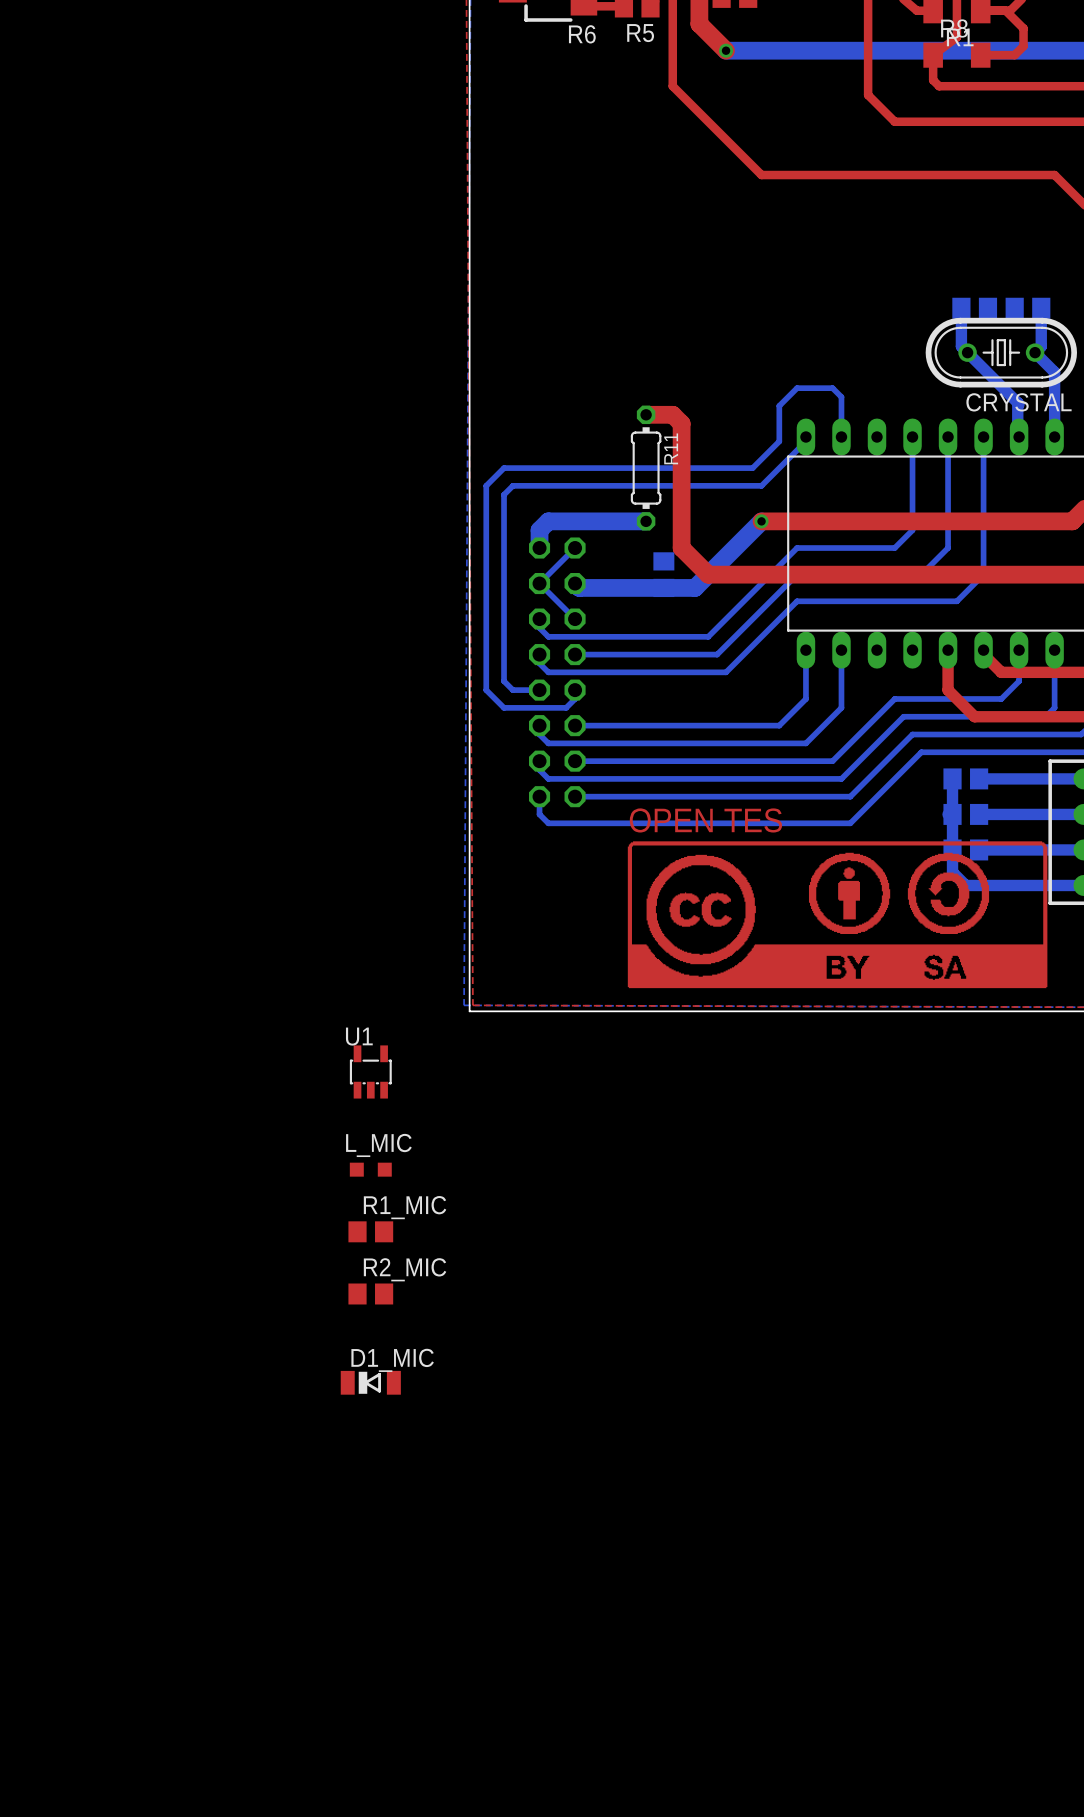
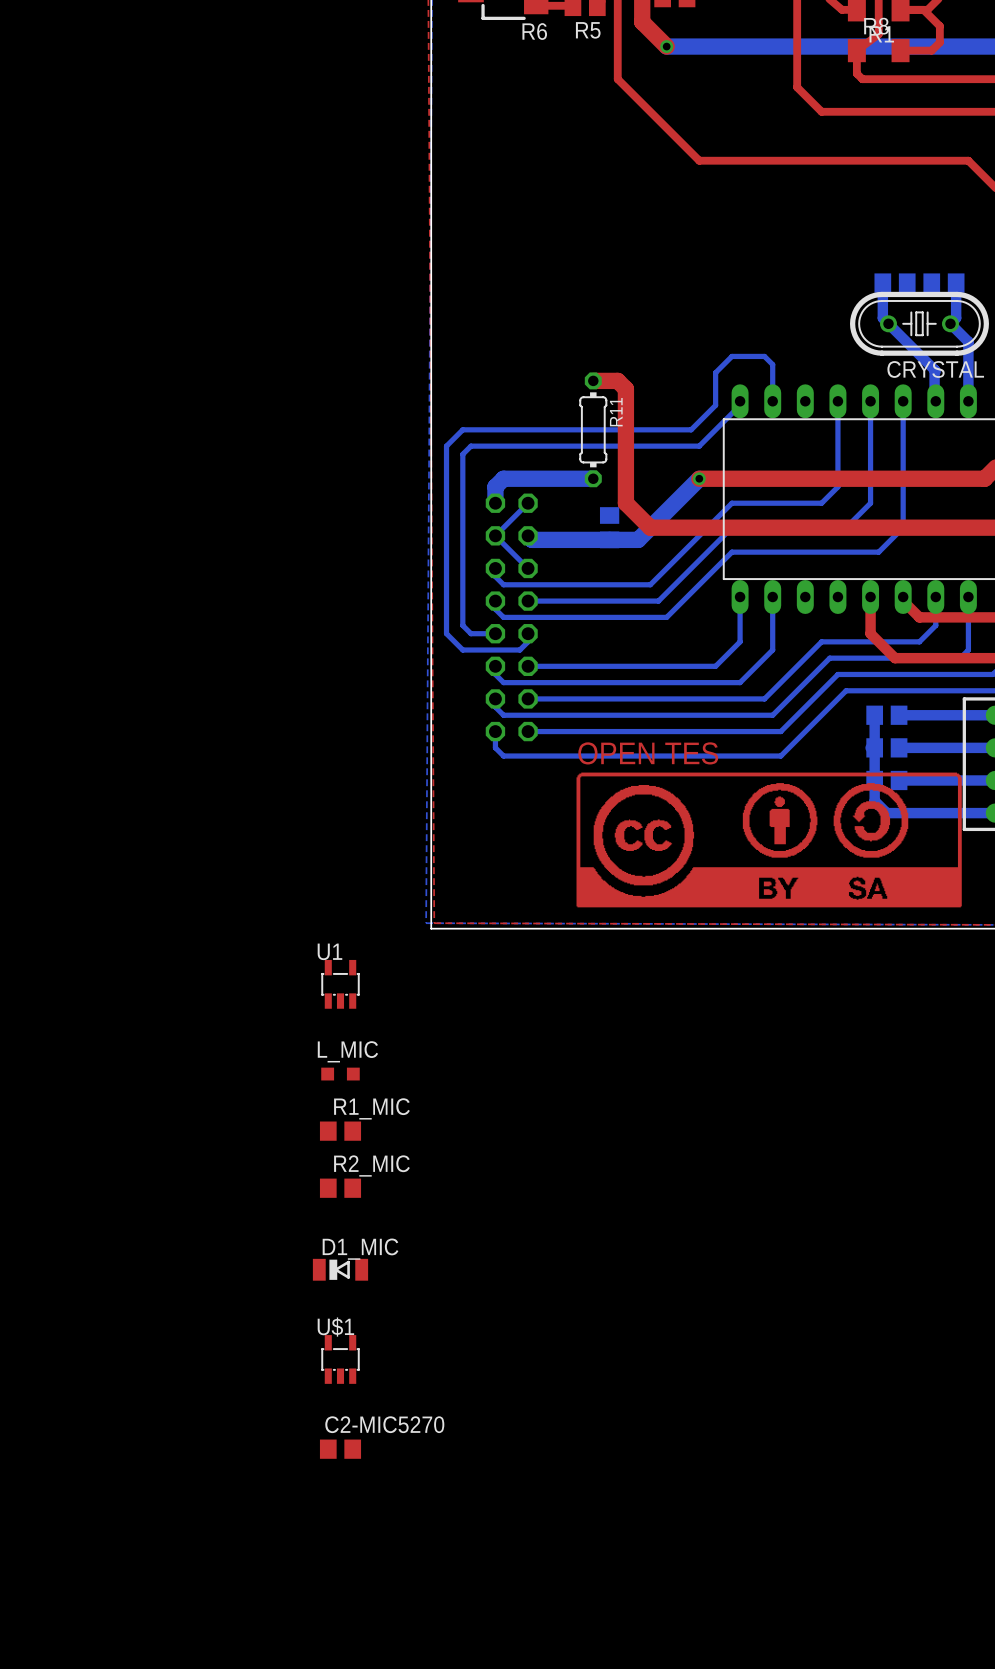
U$1: none -> (340, 1359)
C2-MIC5270: none -> (340, 1449)

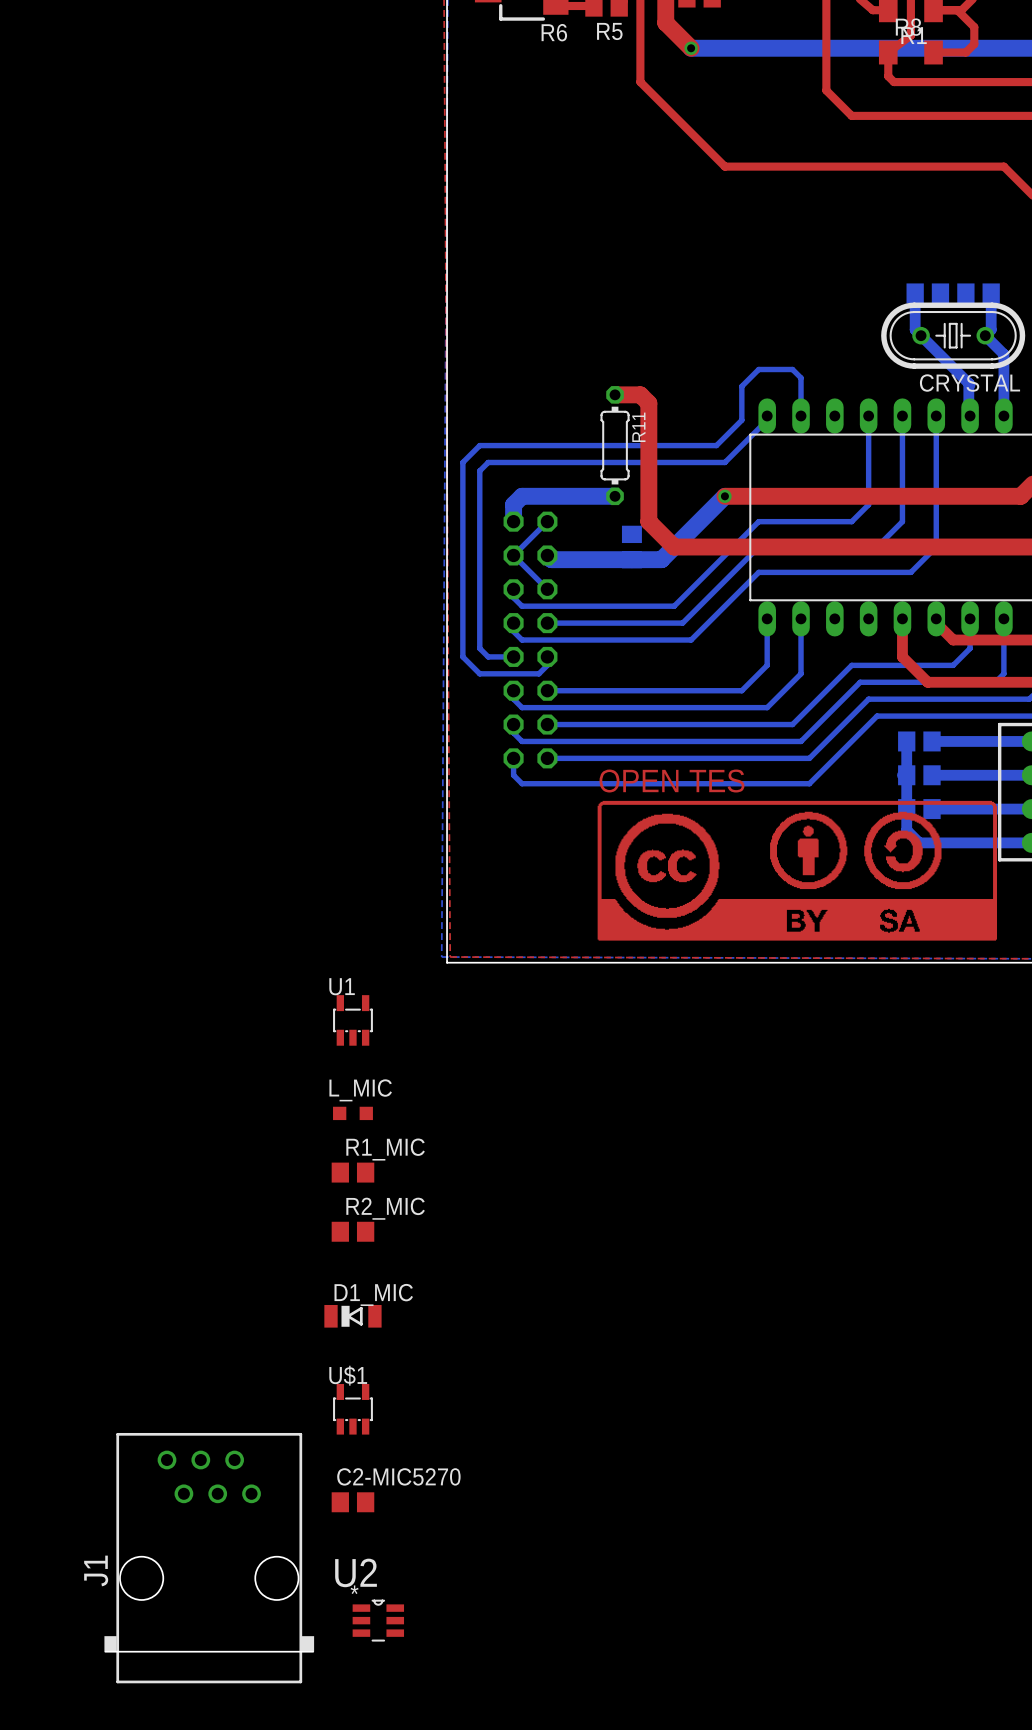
J1: none -> (209, 1558)
U2: none -> (378, 1620)

